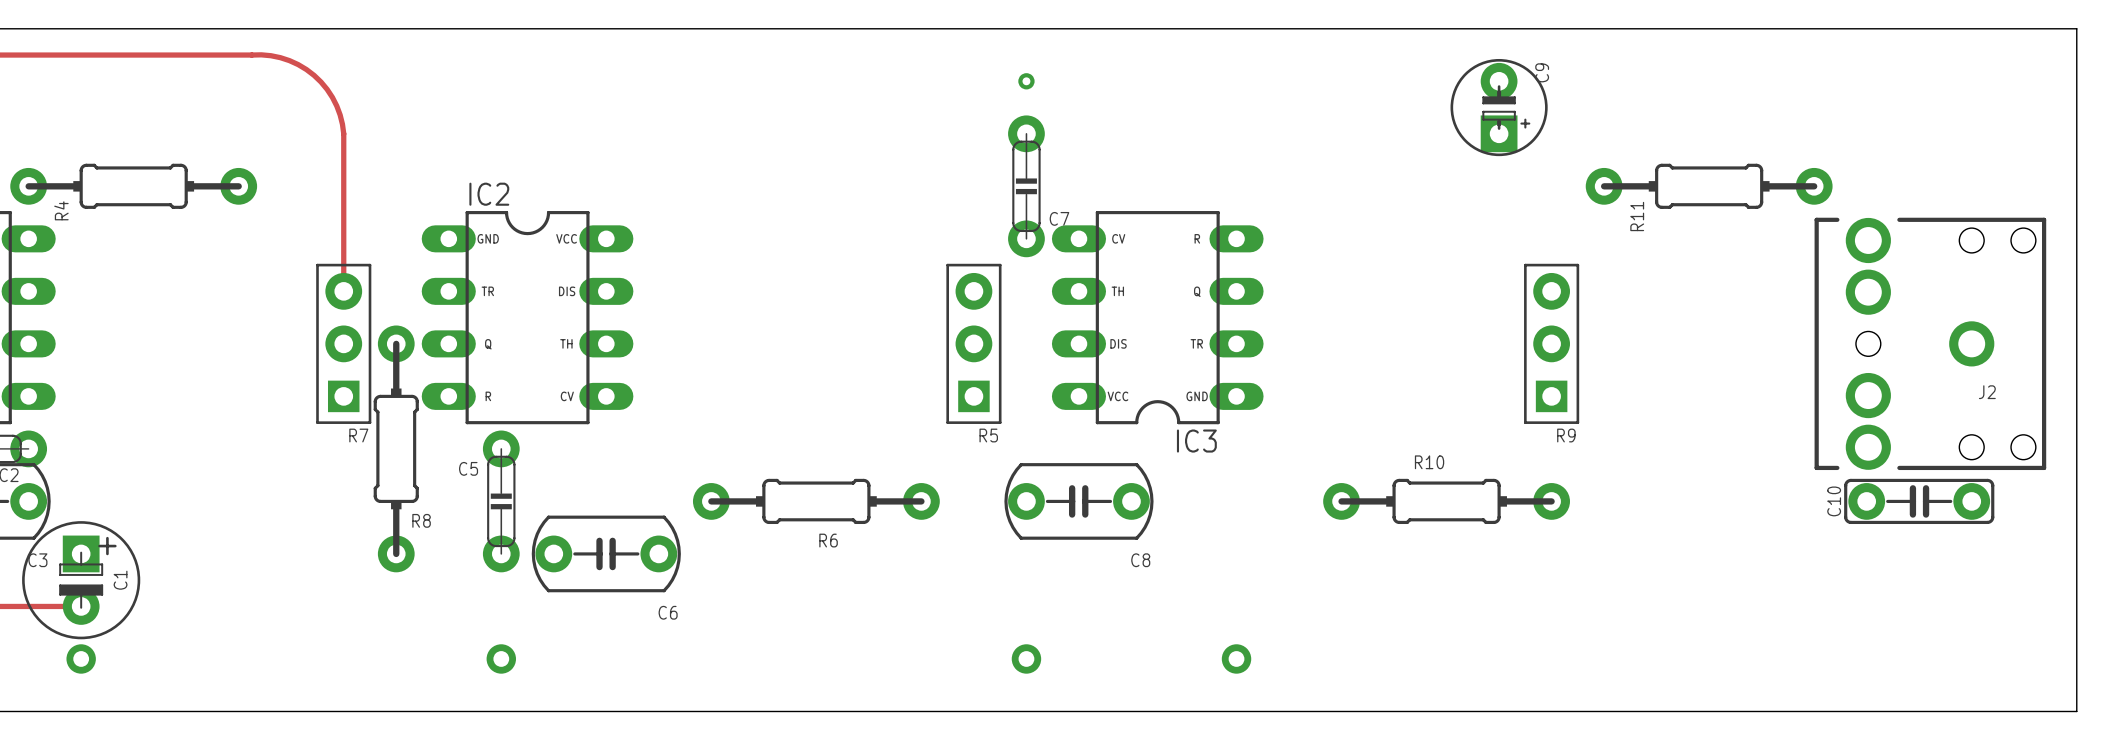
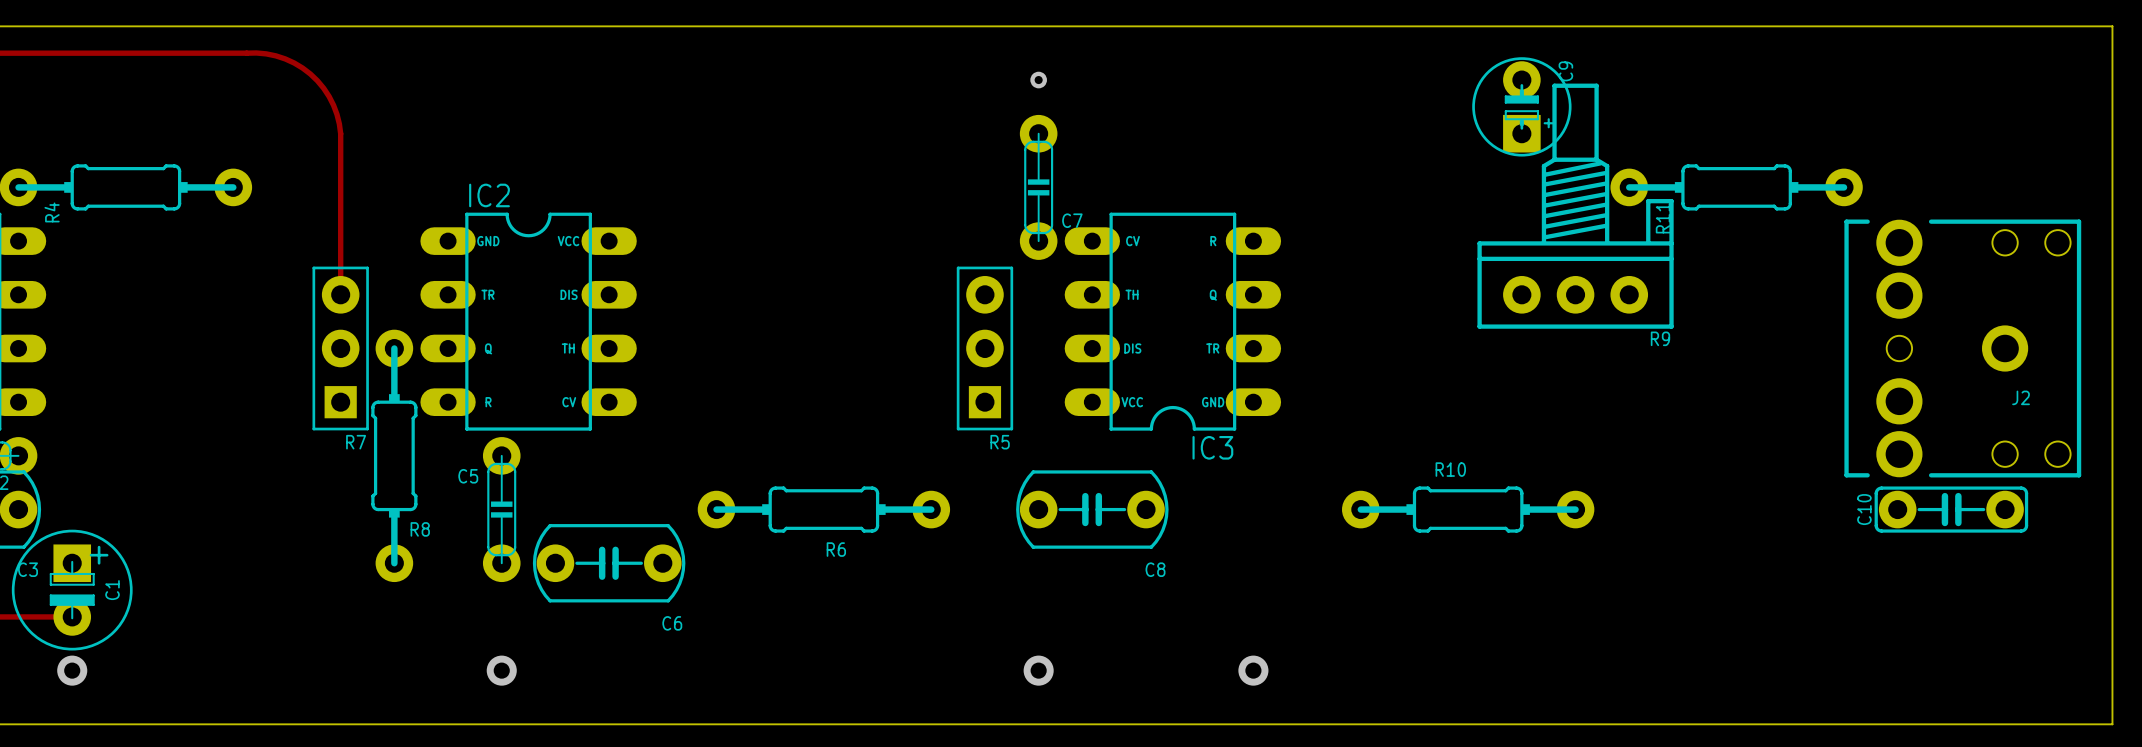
R9 footprint: [1524, 263, 1580, 424] -> [1477, 83, 1674, 329]
R9 name position: R9 (1566, 435) -> R9 (1660, 338)

